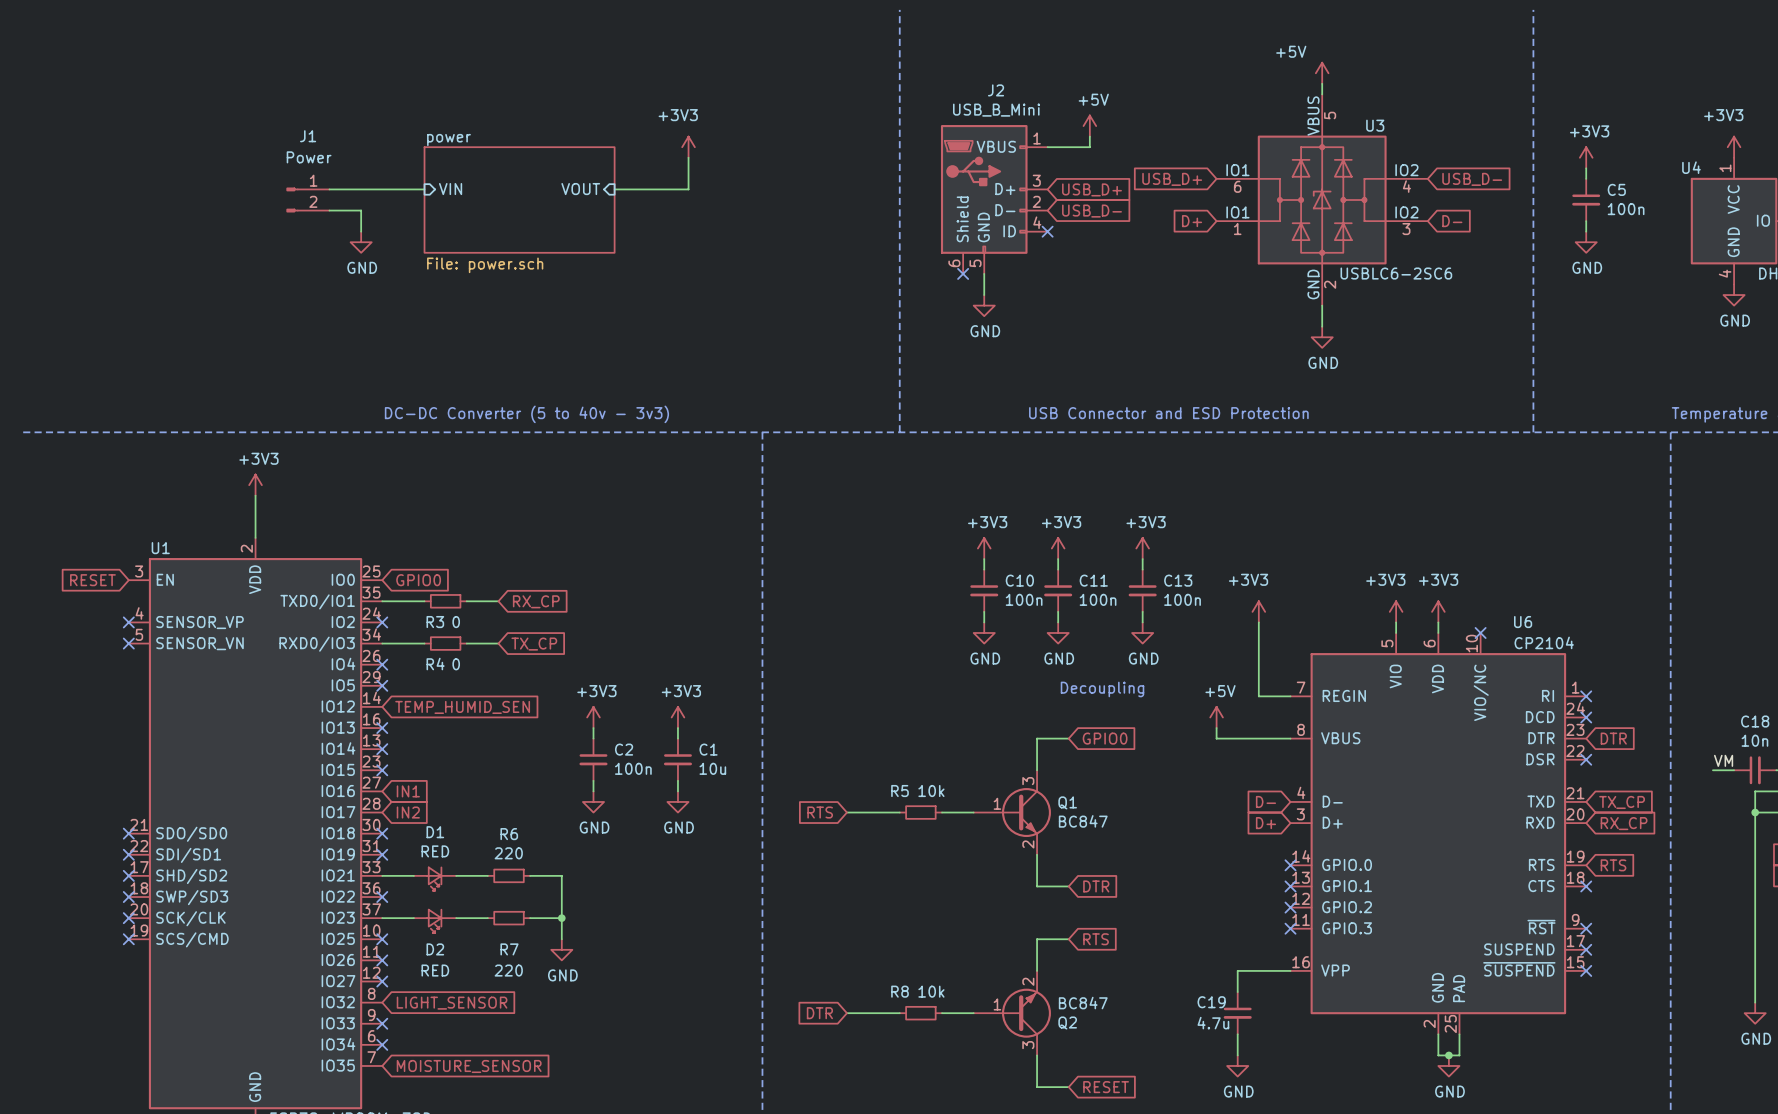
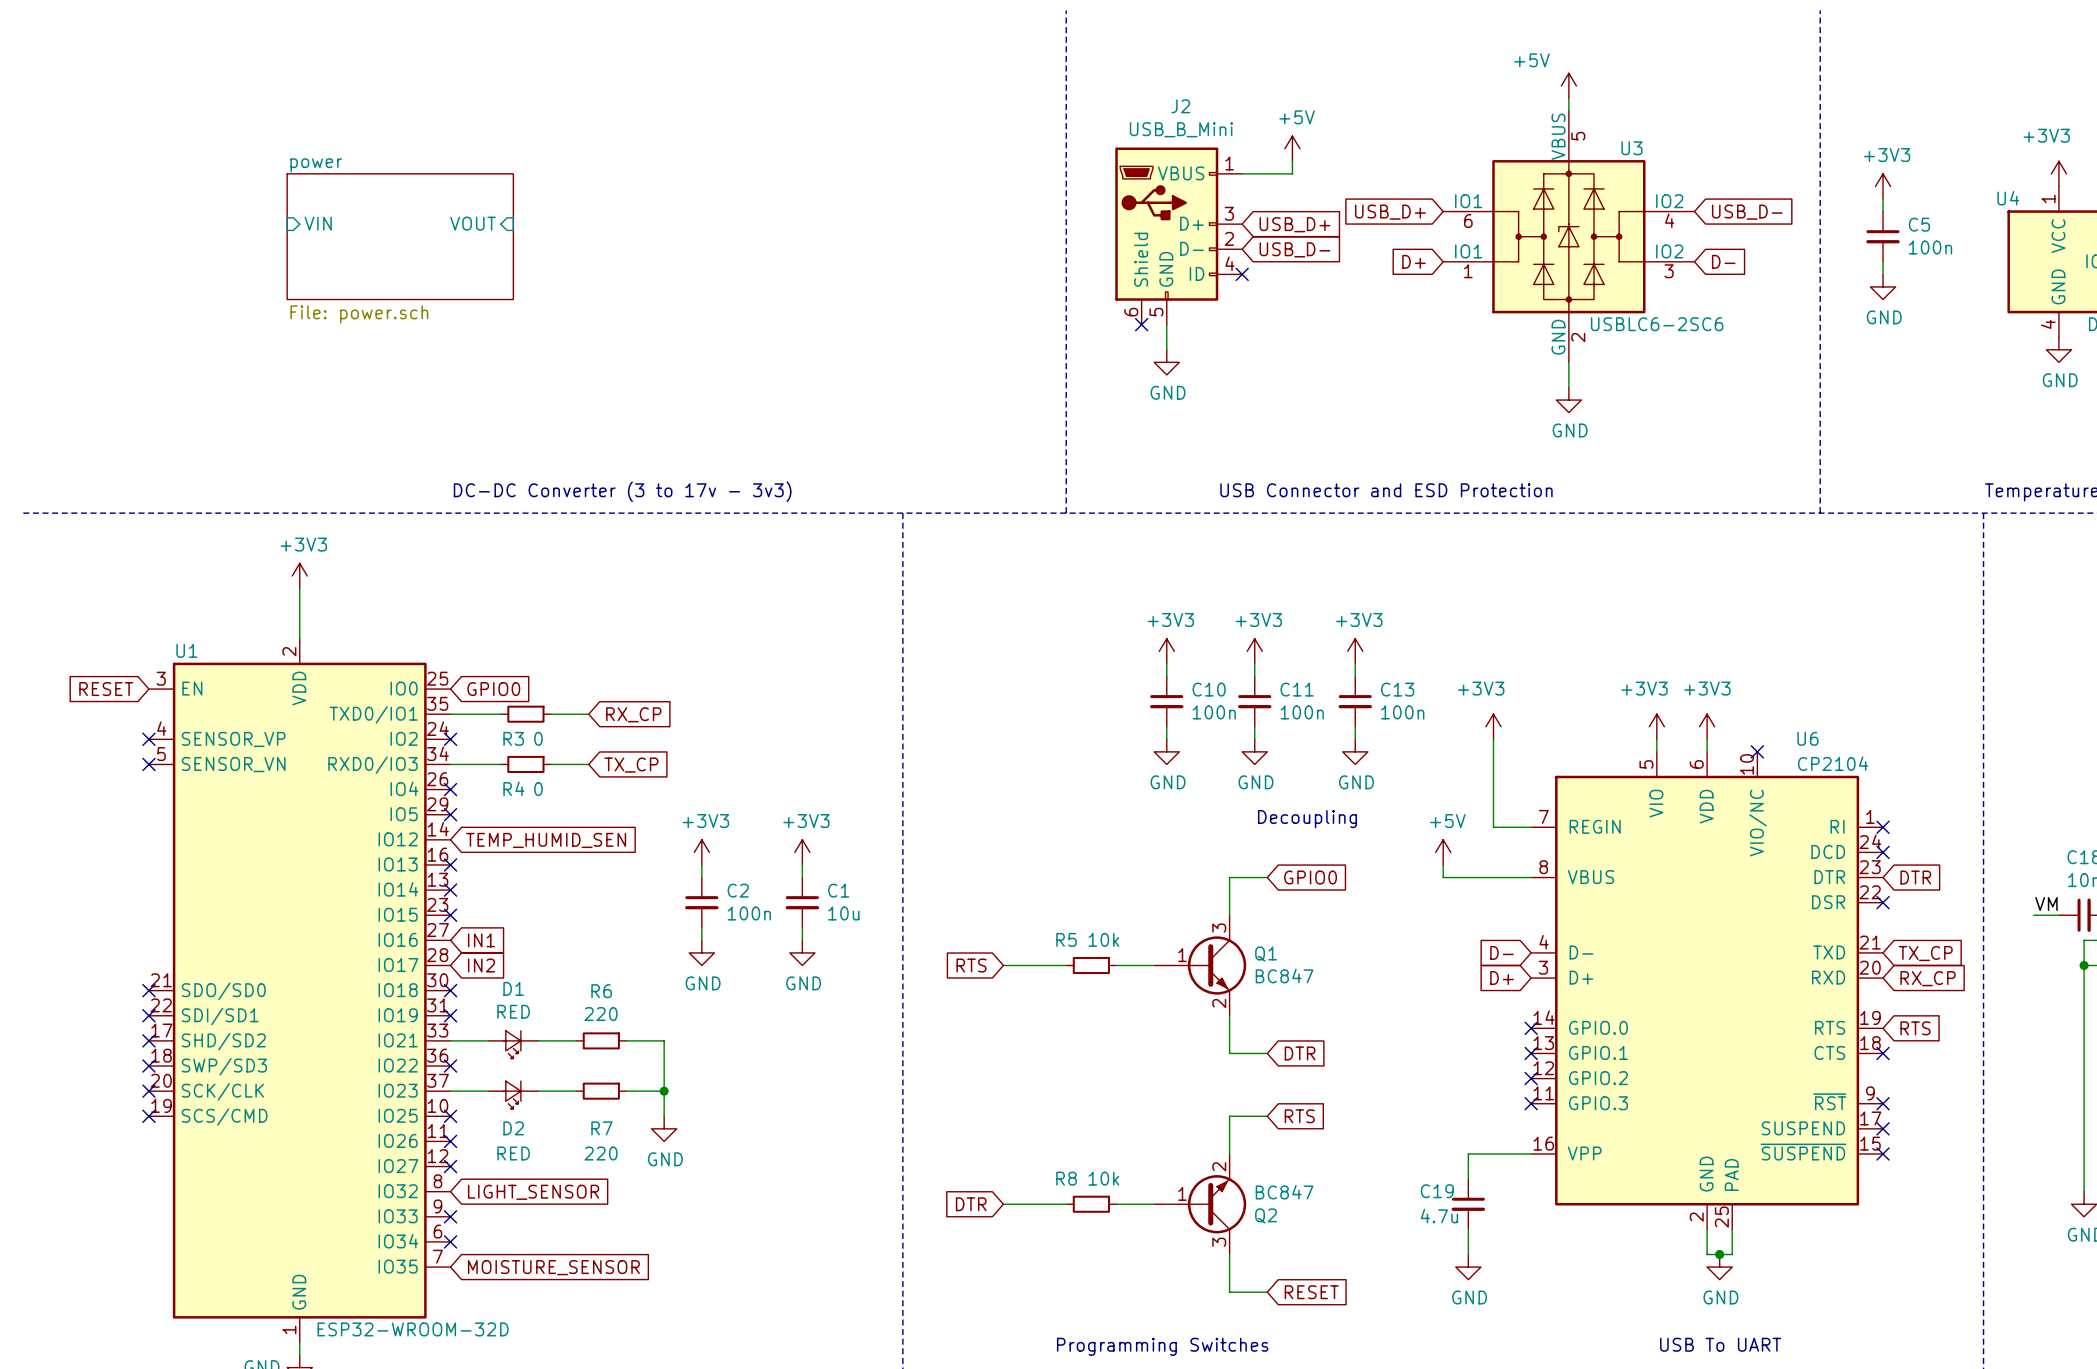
power symbol: +3V3 (688, 147) -> none
wire: (688, 157) (688, 189) (614, 189) -> none
wire: (329, 189) (424, 189) -> none
sheet pin position: VIN (450, 189) -> VIN (318, 223)
sheet pin position: VOUT (580, 189) -> VOUT (473, 223)
J1: Power (308, 199) -> none
sheet power position: (519, 199) -> (400, 236)
wire: (329, 210) (361, 210) (361, 231) -> none
power symbol: GND (361, 242) -> none
text: DC-DC Converter (5 to 40v - 3v3) (526, 414) -> DC-DC Converter (3 to 17v - 3v3) (622, 491)

